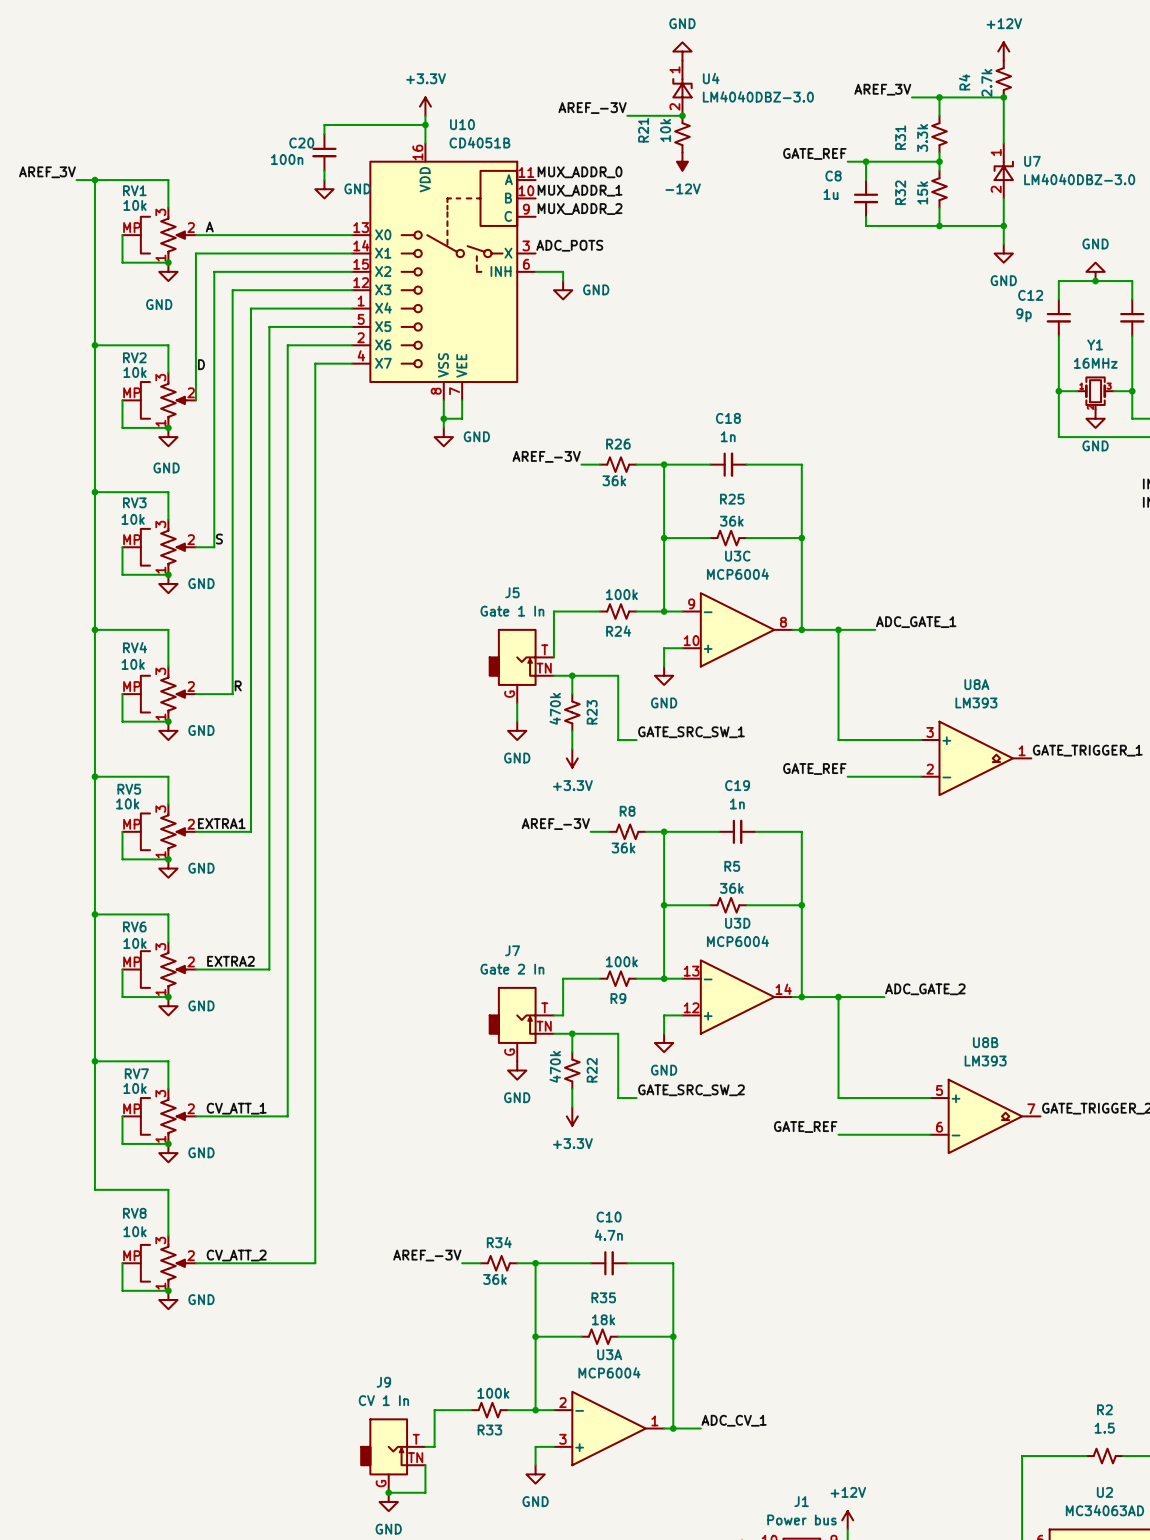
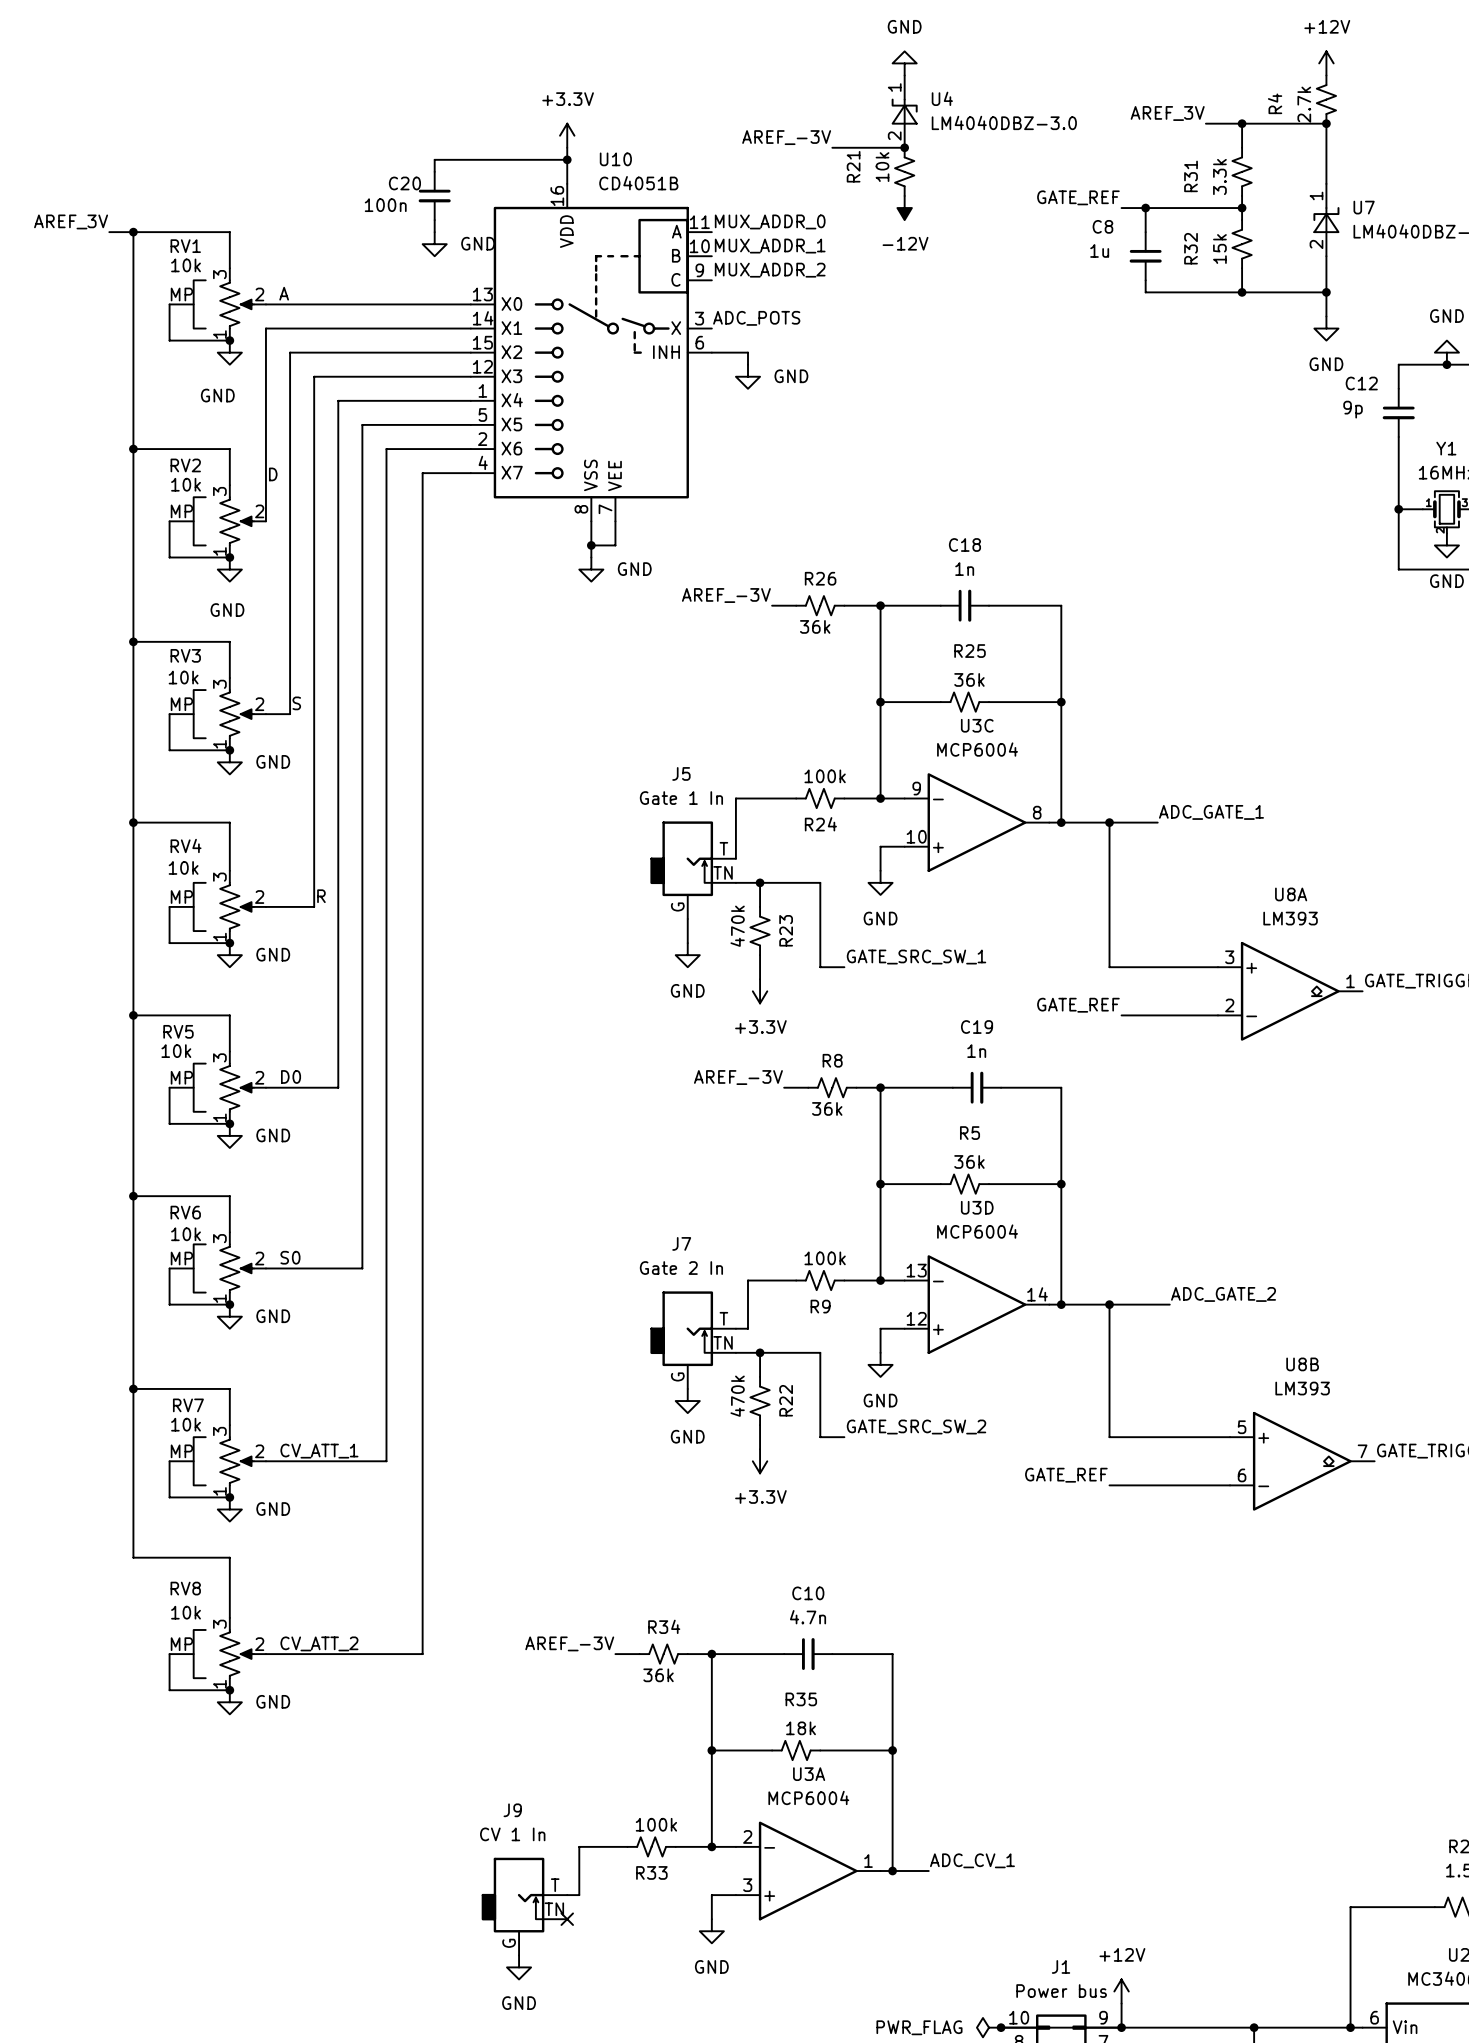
label: none -> D0 (291, 1076)
label: EXTRA1 (221, 823) -> none
label: EXTRA2 (230, 961) -> S0 (290, 1257)
wire: (425, 1465) (425, 1492) (388, 1492) -> none
no-connect mark: none -> (567, 1919)
junction: (388, 1492) -> none

